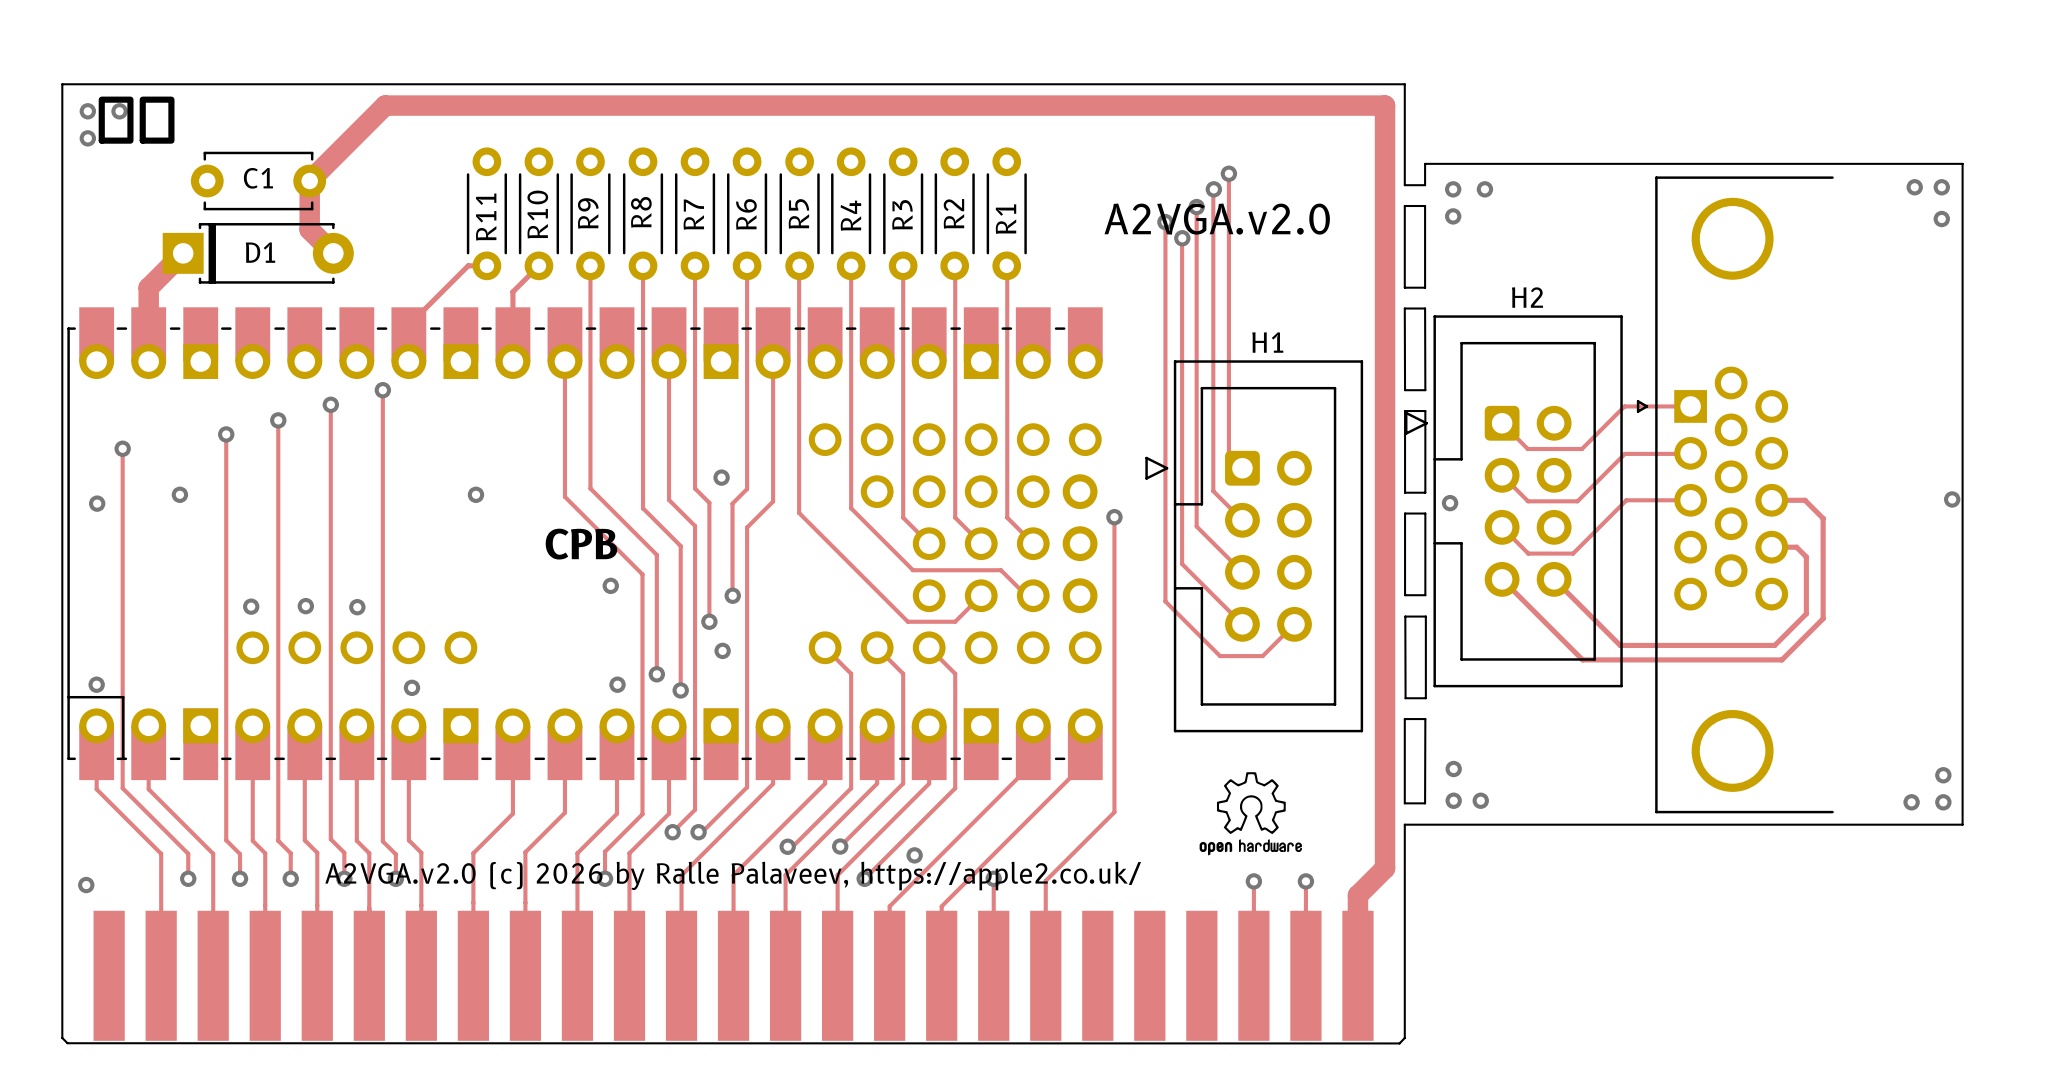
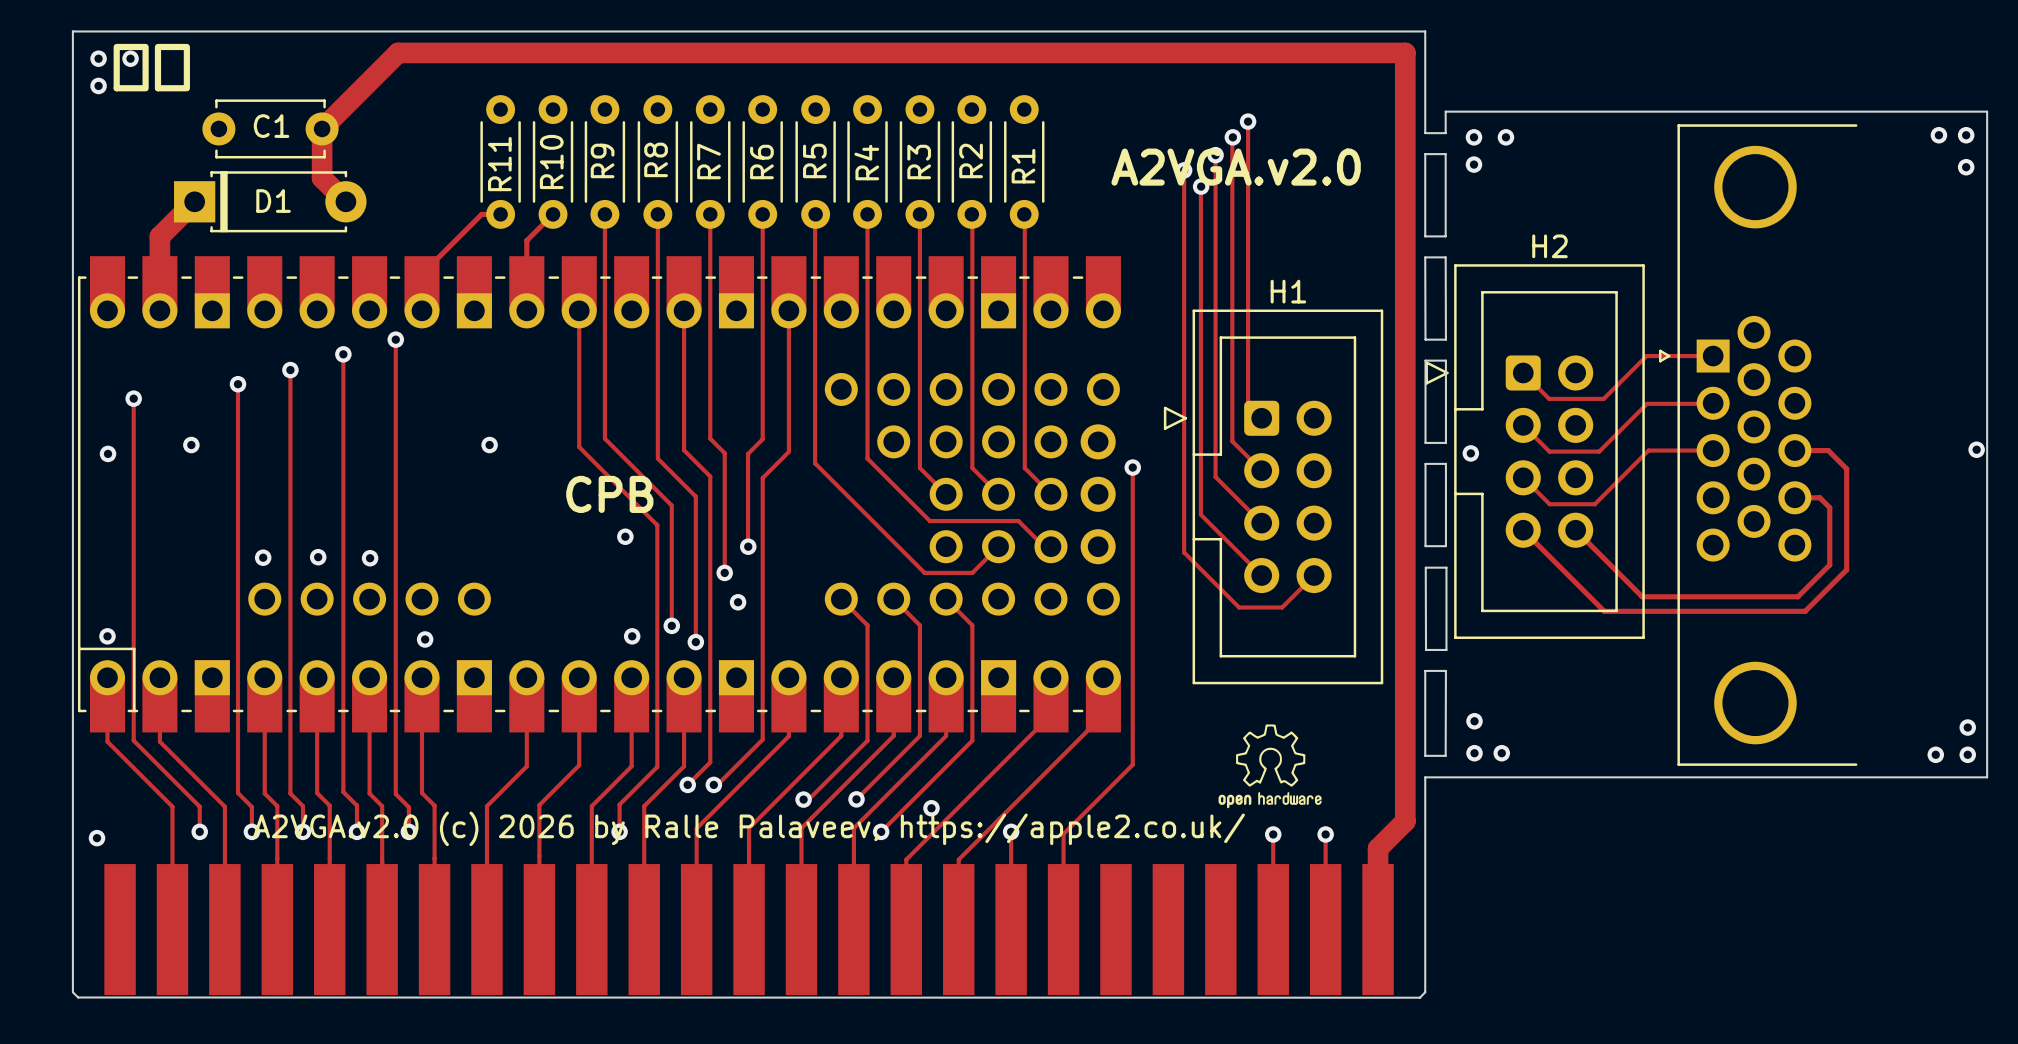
via: (721, 477) -> none

